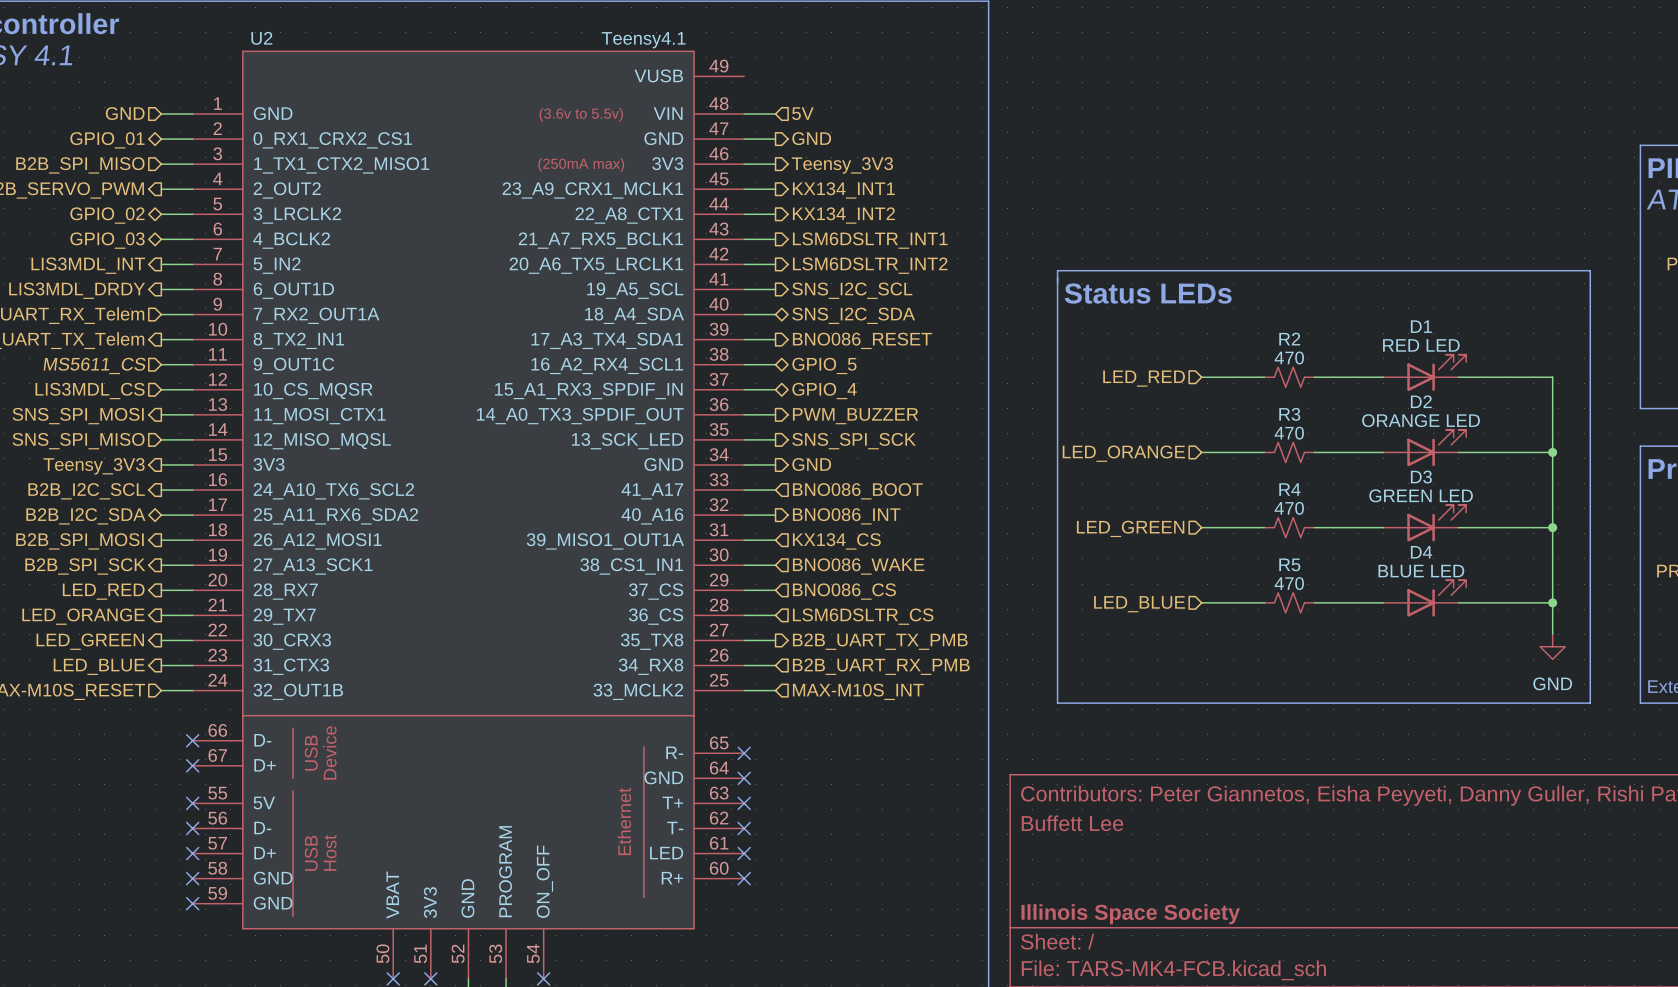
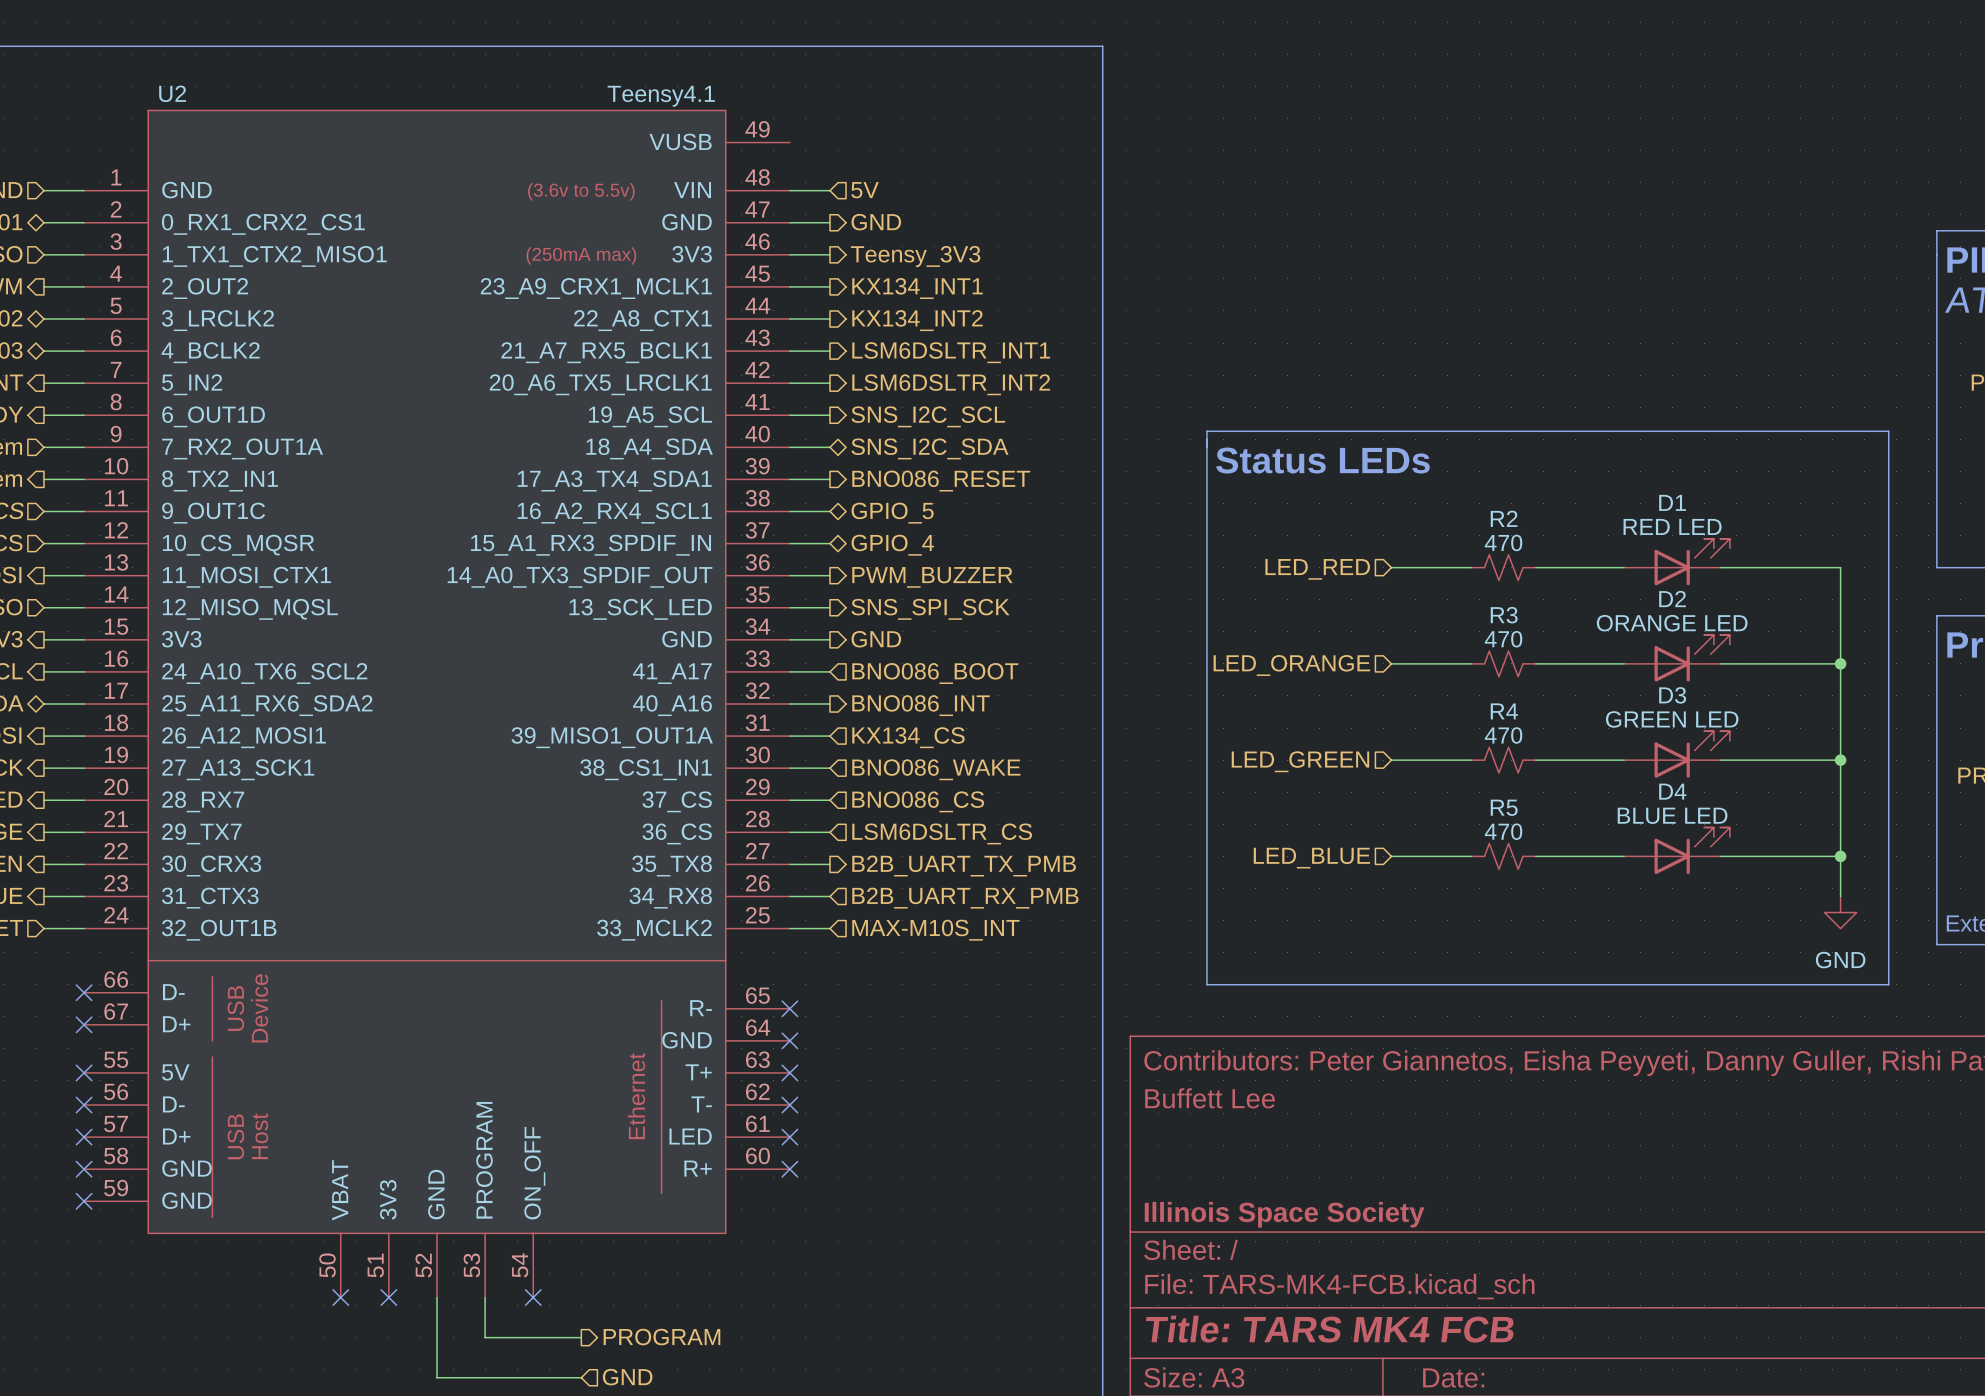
line: (1057, 270) (1057, 703) (1590, 703) (1590, 270) (1057, 270) -> (1206, 431) (1206, 984) (1888, 984) (1888, 431) (1206, 431)
text position: Status LEDs (1148, 293) -> Status LEDs (1322, 460)
D1 position: (1424, 372) -> (1676, 562)
wire: (1201, 377) (1264, 377) -> (1391, 567) (1471, 567)
R2 position: (1289, 377) -> (1503, 567)
wire: (1314, 377) (1383, 377) -> (1535, 567) (1624, 567)
wire: (1458, 377) (1552, 377) (1552, 634) -> (1720, 567) (1840, 567) (1840, 896)
hierarchical label position: LED_RED (1144, 378) -> LED_RED (1317, 569)
D2 position: (1424, 448) -> (1676, 658)
wire: (1201, 452) (1264, 452) -> (1391, 663) (1471, 663)
R3 position: (1289, 452) -> (1503, 663)
wire: (1314, 452) (1383, 452) -> (1535, 663) (1624, 663)
wire: (1458, 452) (1552, 452) -> (1720, 663) (1840, 663)
junction: (1552, 452) -> none
hierarchical label position: LED_ORANGE (1123, 453) -> LED_ORANGE (1291, 665)
junction: none -> (1840, 663)
D3 position: (1424, 523) -> (1676, 754)
wire: (1201, 527) (1264, 527) -> (1391, 760) (1471, 760)
R4 position: (1289, 527) -> (1503, 760)
wire: (1314, 527) (1383, 527) -> (1535, 760) (1624, 760)
wire: (1458, 527) (1552, 527) -> (1720, 760) (1840, 760)
junction: (1552, 527) -> none
hierarchical label position: LED_GREEN (1130, 528) -> LED_GREEN (1300, 761)
junction: none -> (1840, 760)
D4 position: (1424, 598) -> (1676, 850)
wire: (1201, 602) (1264, 602) -> (1391, 856) (1471, 856)
R5 position: (1289, 602) -> (1503, 856)
wire: (1314, 602) (1383, 602) -> (1535, 856) (1624, 856)
wire: (1458, 602) (1552, 602) -> (1720, 856) (1840, 856)
junction: (1552, 602) -> none
hierarchical label position: LED_BLUE (1139, 604) -> LED_BLUE (1311, 858)
junction: none -> (1840, 856)
power symbol position: GND (1552, 646) -> GND (1840, 912)

